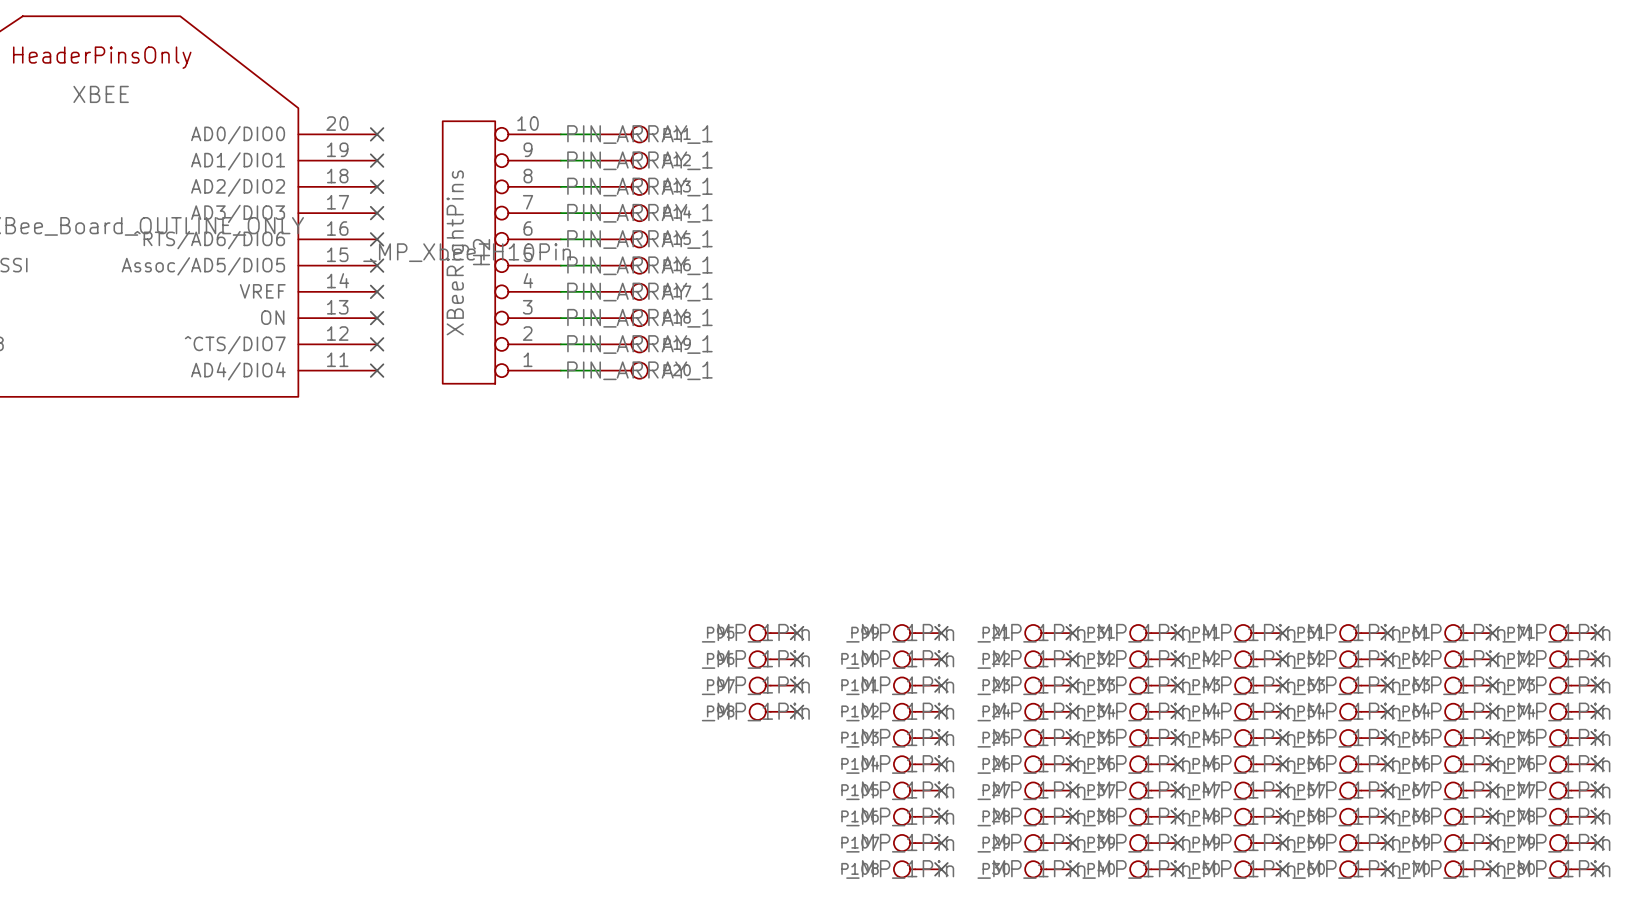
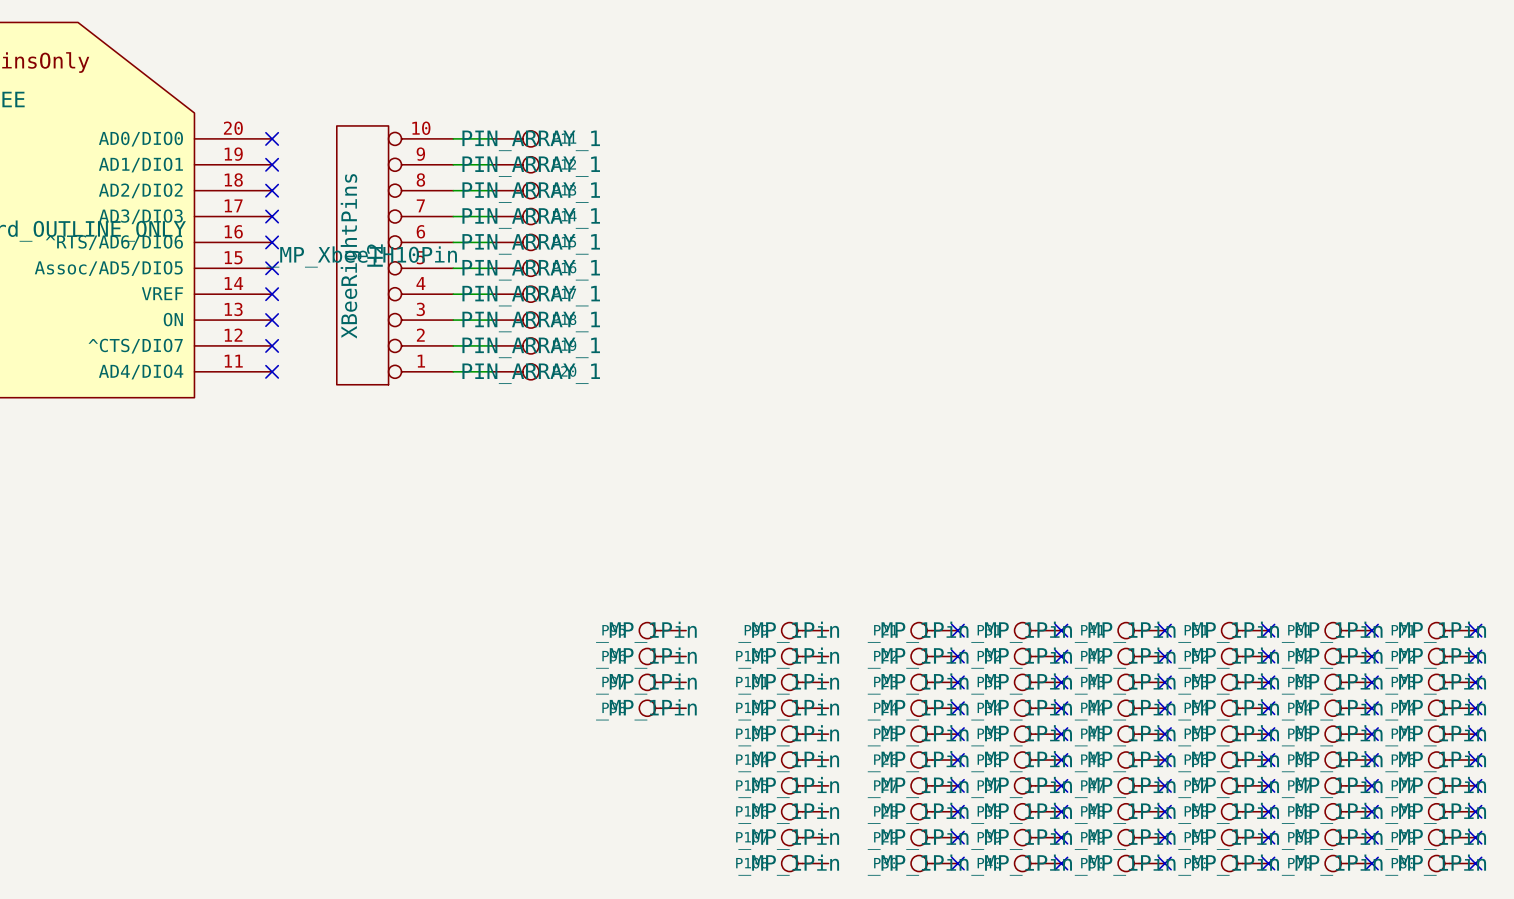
no-connect mark: (797, 633) -> none
no-connect mark: (941, 633) -> none
no-connect mark: (797, 659) -> none
no-connect mark: (941, 659) -> none
no-connect mark: (797, 685) -> none
no-connect mark: (941, 685) -> none
no-connect mark: (797, 711) -> none
no-connect mark: (941, 711) -> none
no-connect mark: (941, 738) -> none
no-connect mark: (941, 764) -> none
no-connect mark: (941, 790) -> none
no-connect mark: (941, 816) -> none
no-connect mark: (941, 843) -> none
no-connect mark: (941, 869) -> none

